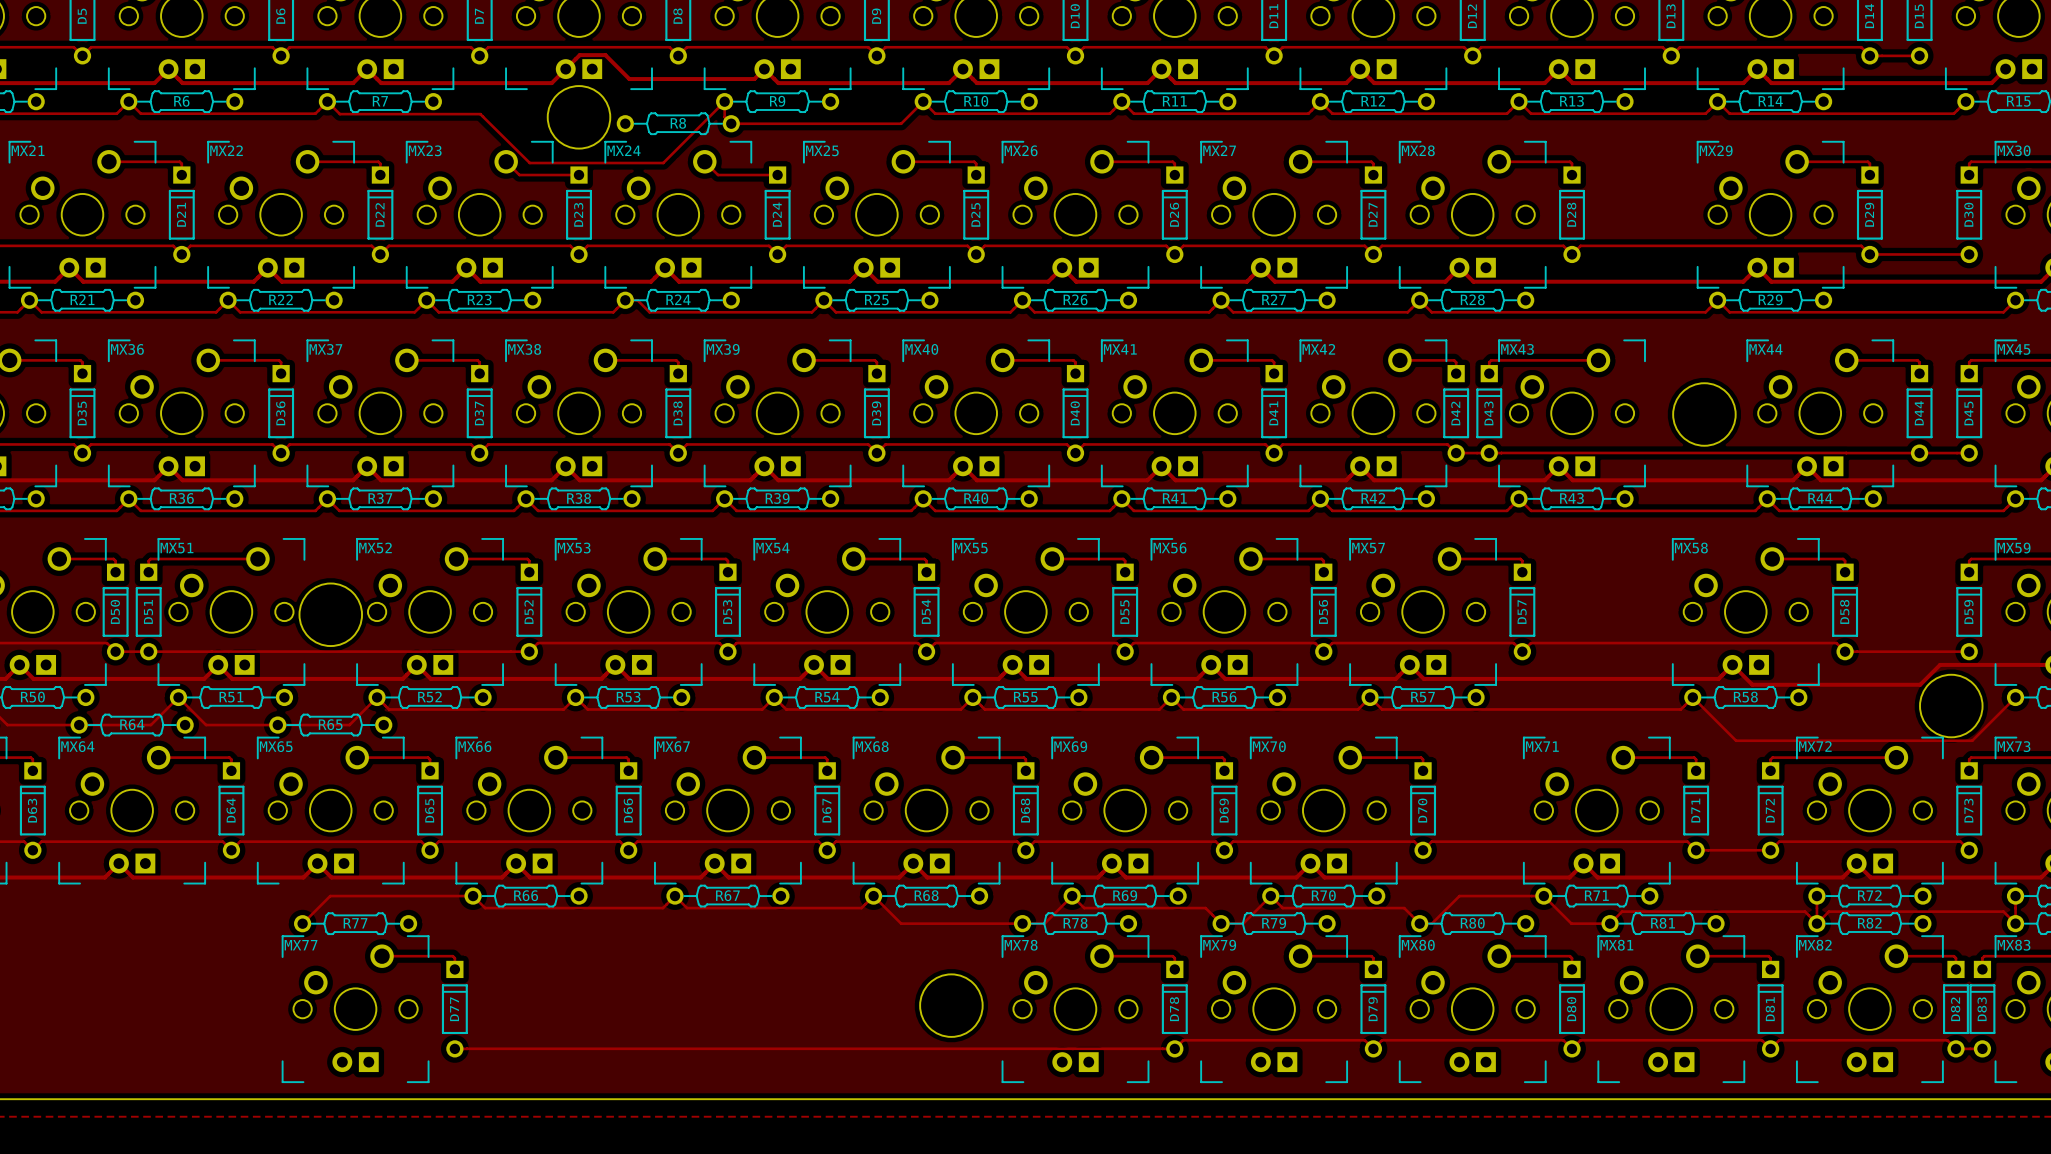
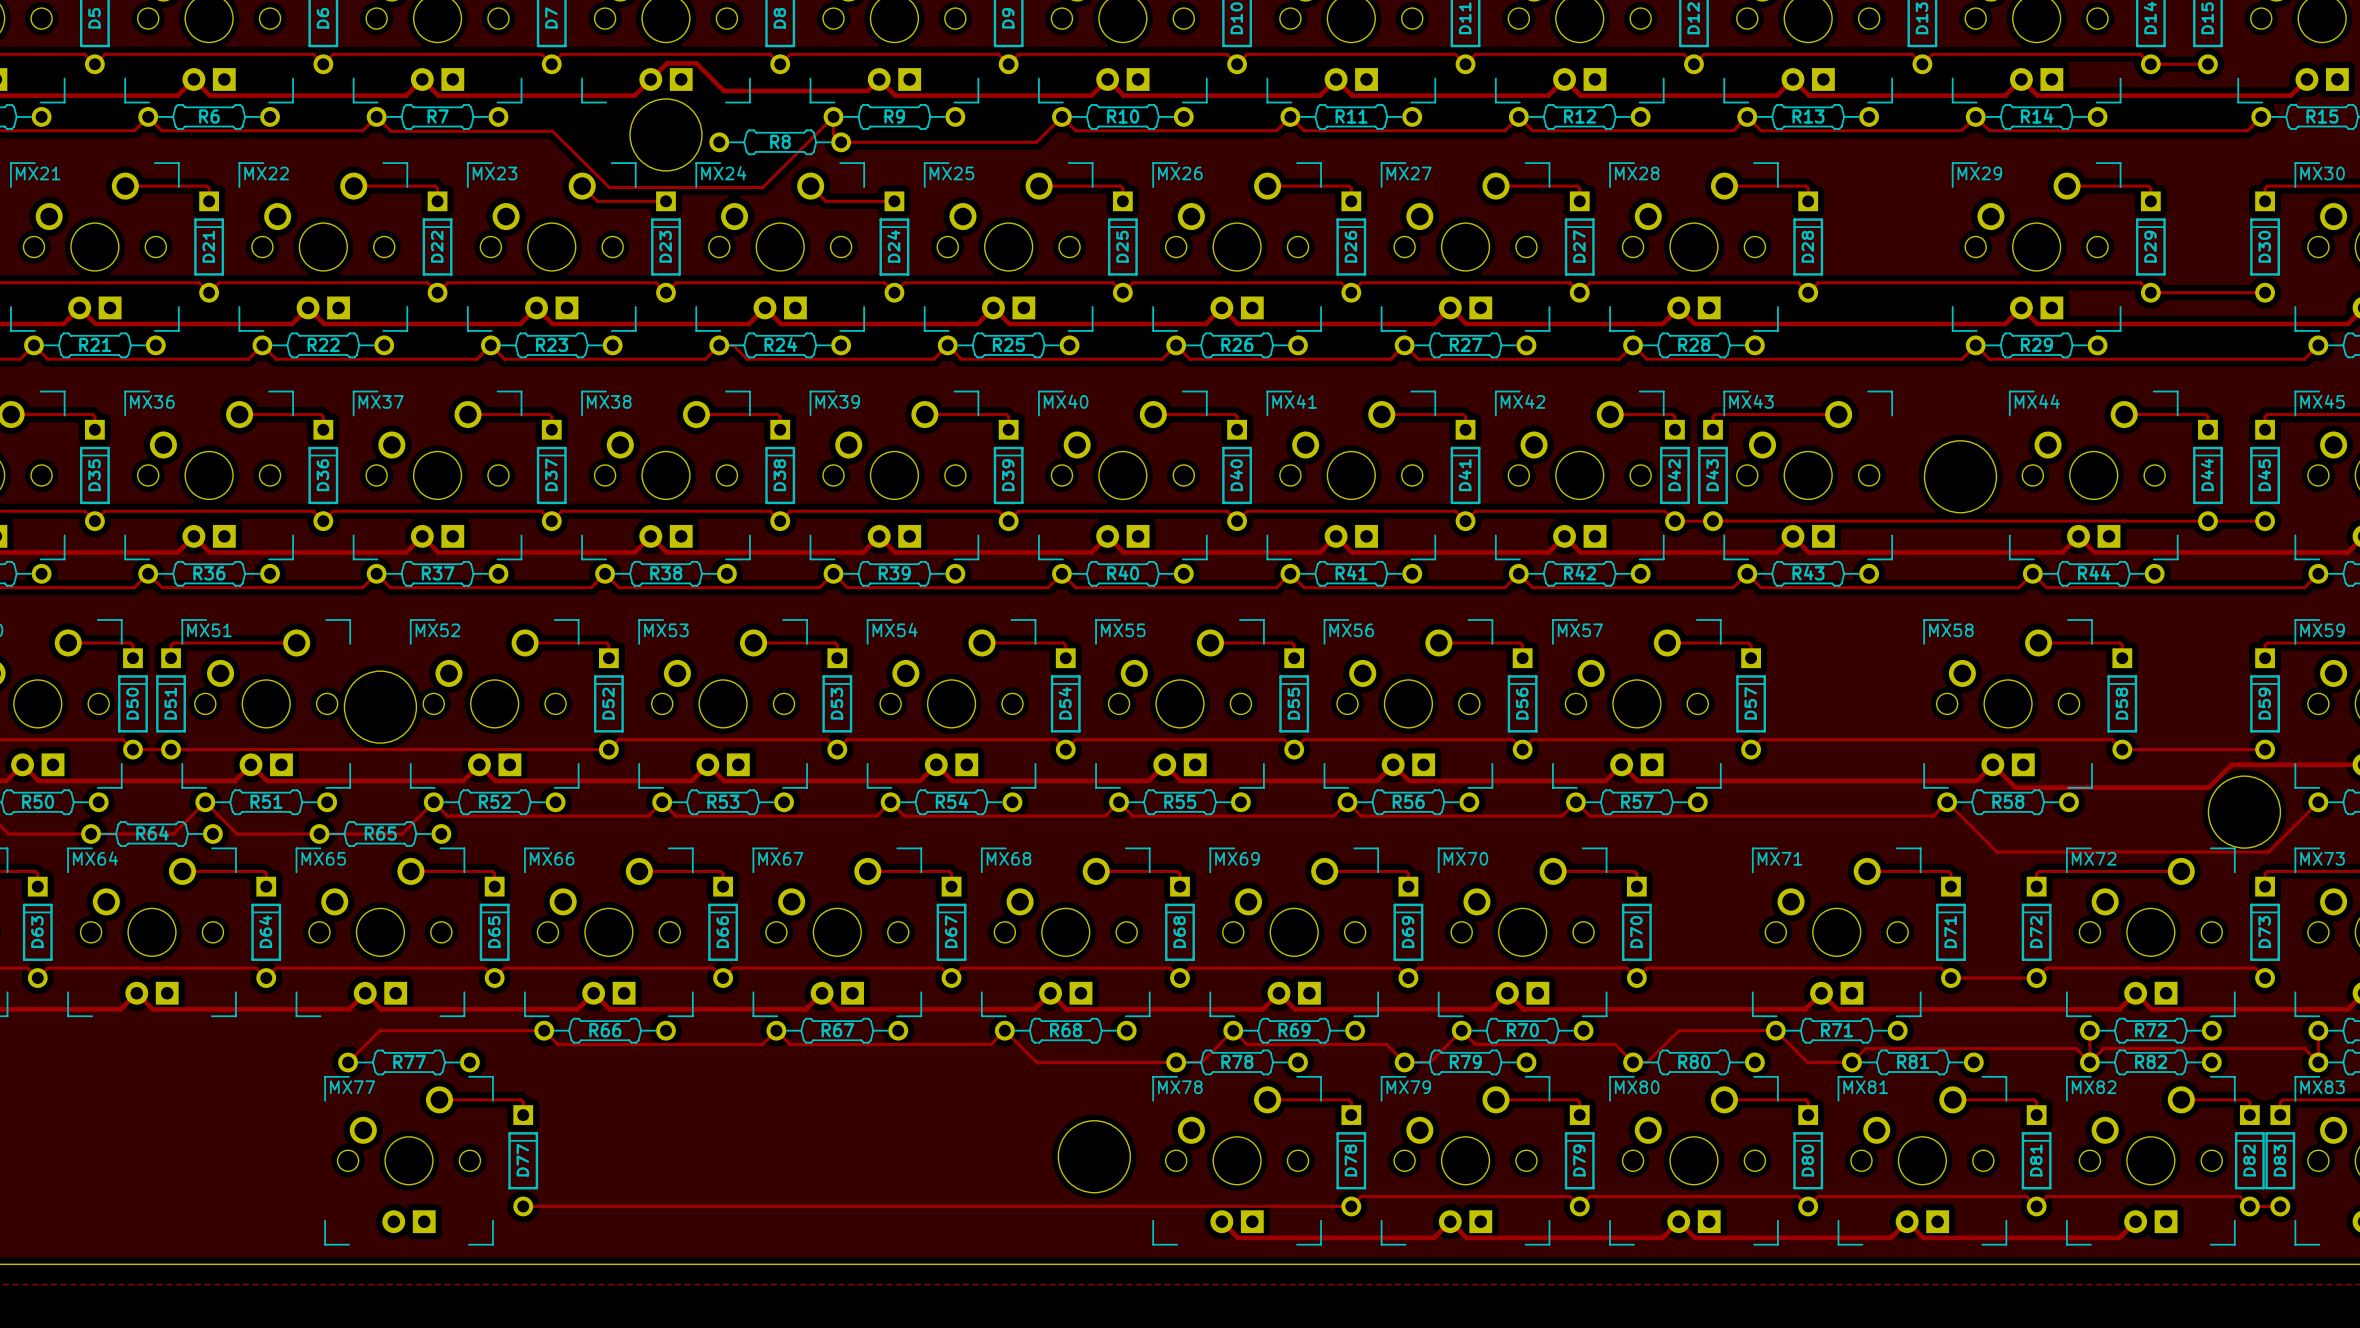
track: none -> (1221, 1221) (1237, 1237) (1434, 1237) (1450, 1221) (1466, 1237) (1662, 1237) (1678, 1221) (1694, 1237) (1891, 1237) (1907, 1221) (1923, 1237) (2119, 1237) (2135, 1221)

